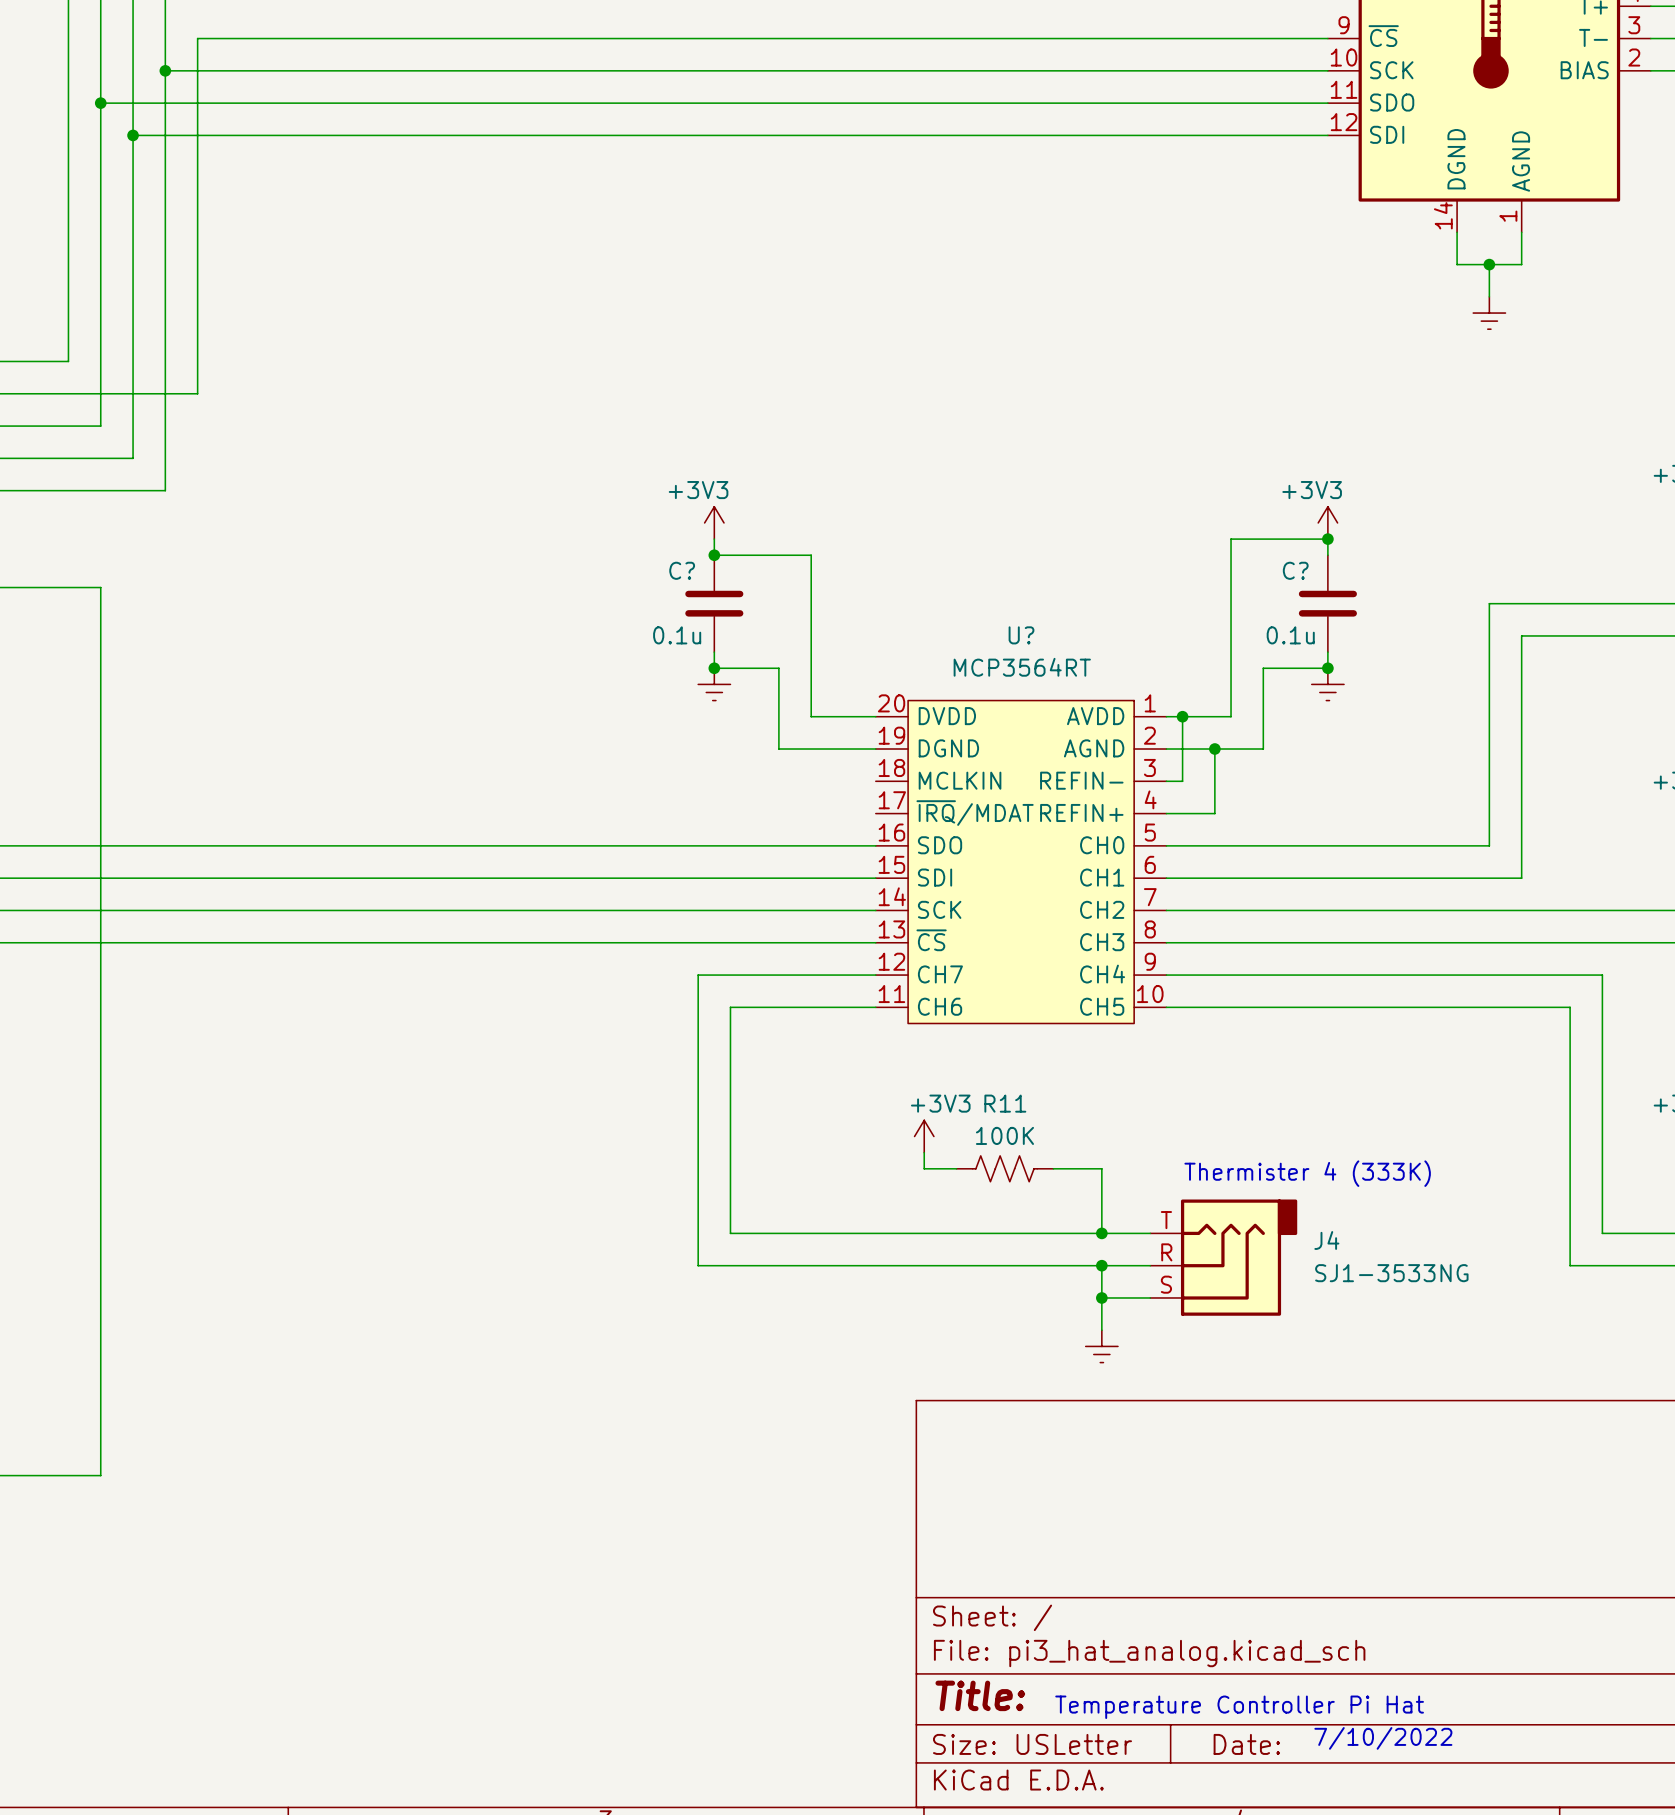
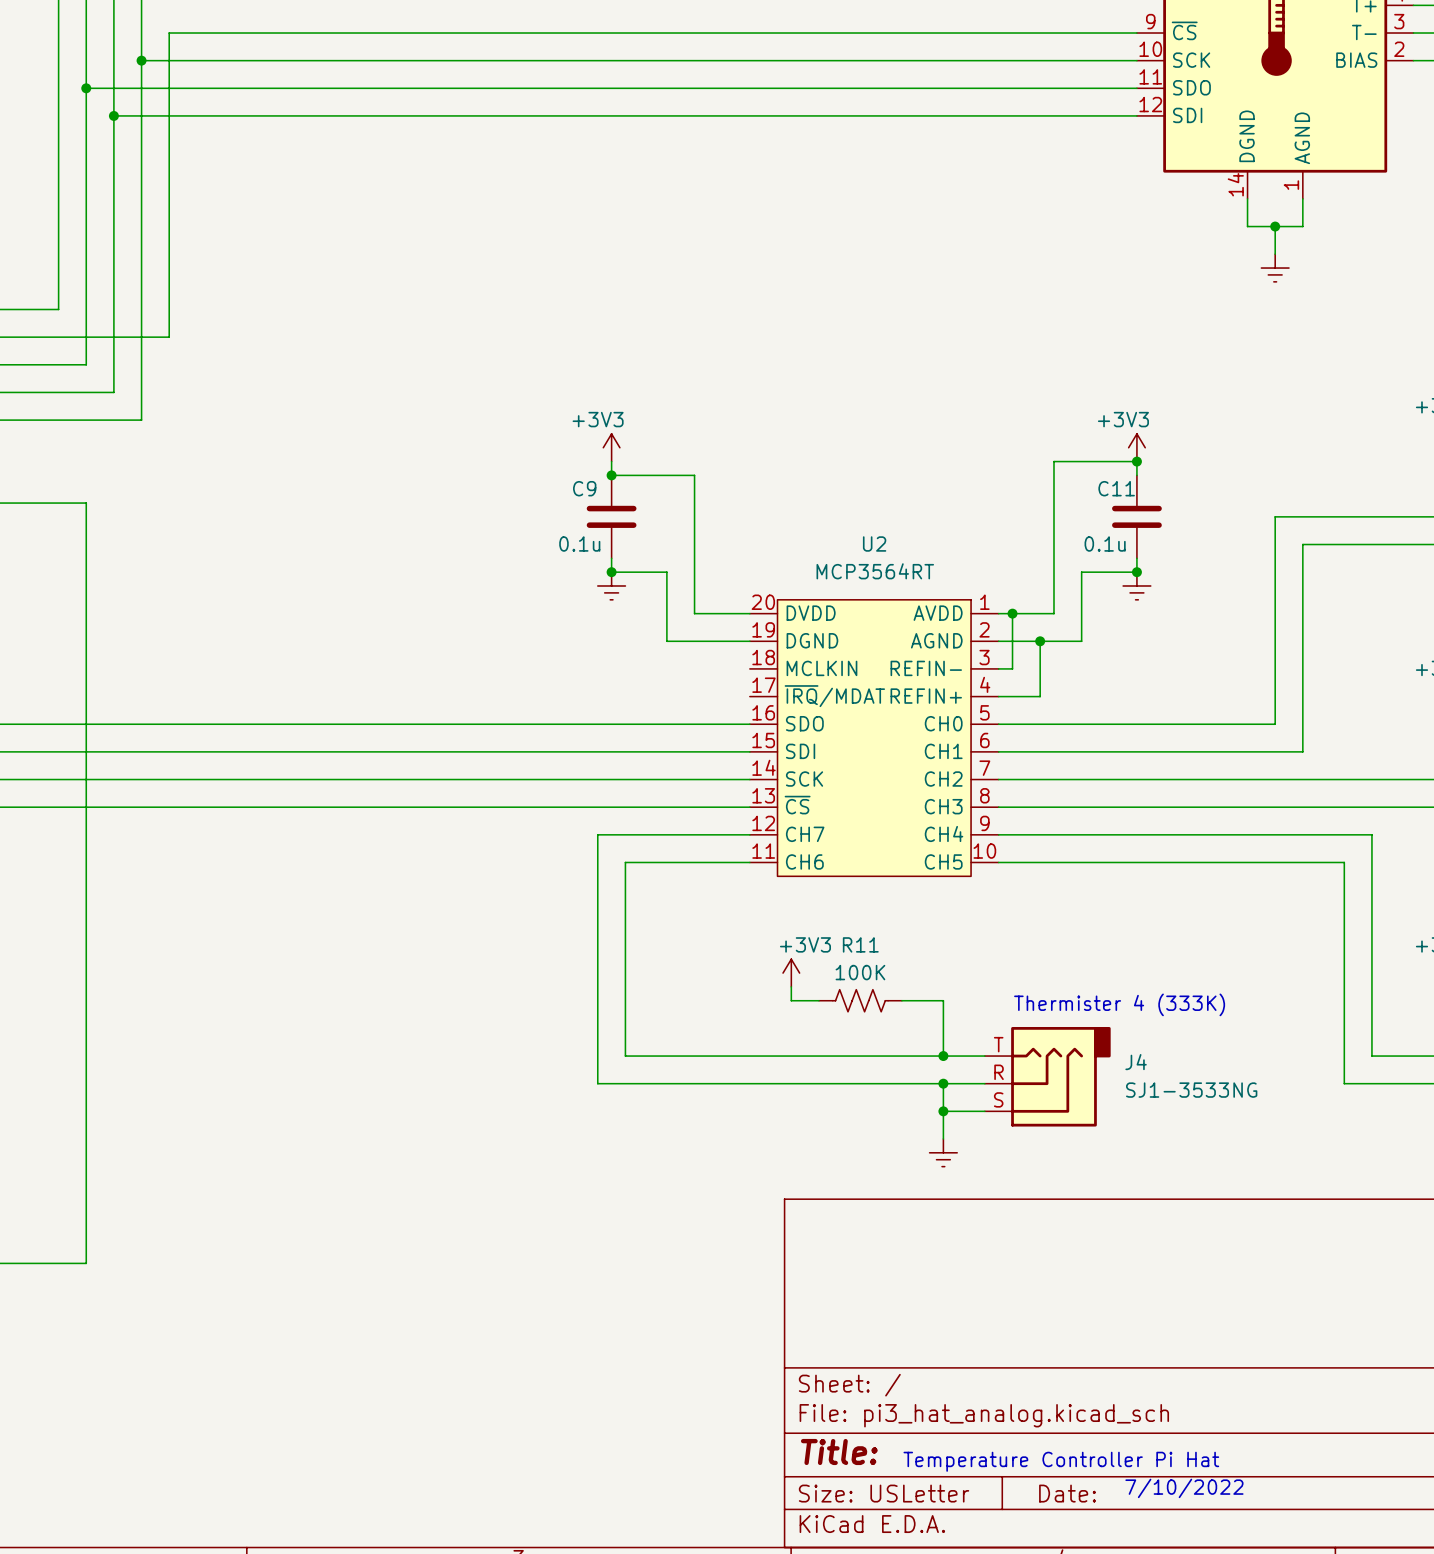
C? name: C? (682, 570) -> C9 (584, 488)
C? name: C? (1295, 570) -> C11 (1116, 488)
U? name: U? (1021, 635) -> U2 (874, 544)

